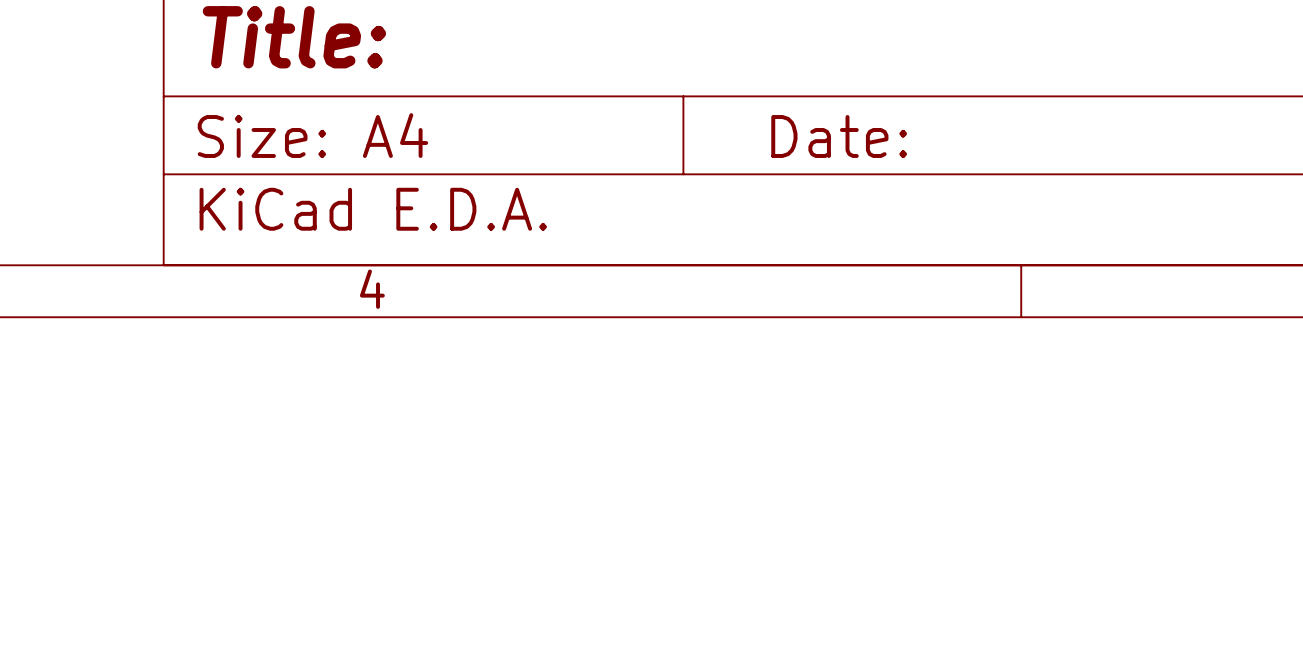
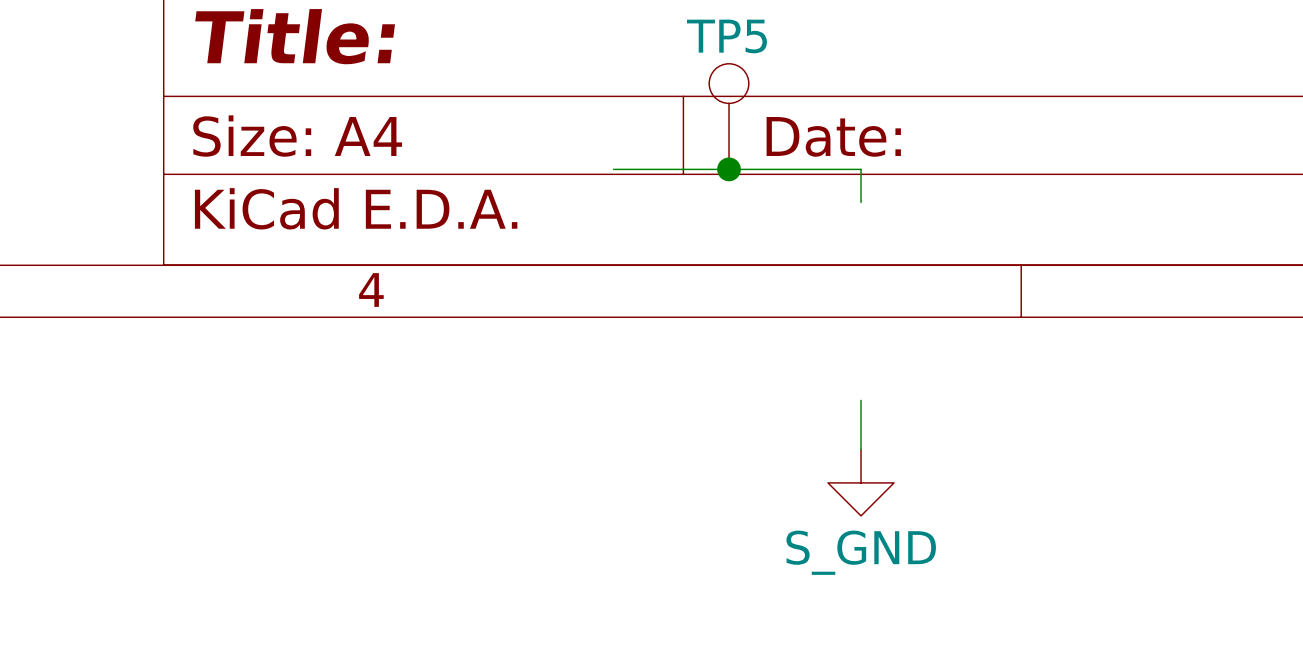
TP5: none -> (729, 116)
wire: none -> (613, 169) (861, 169) (861, 202)
junction: none -> (729, 169)
wire: none -> (861, 400) (861, 449)
power symbol: none -> S_GND (861, 482)

